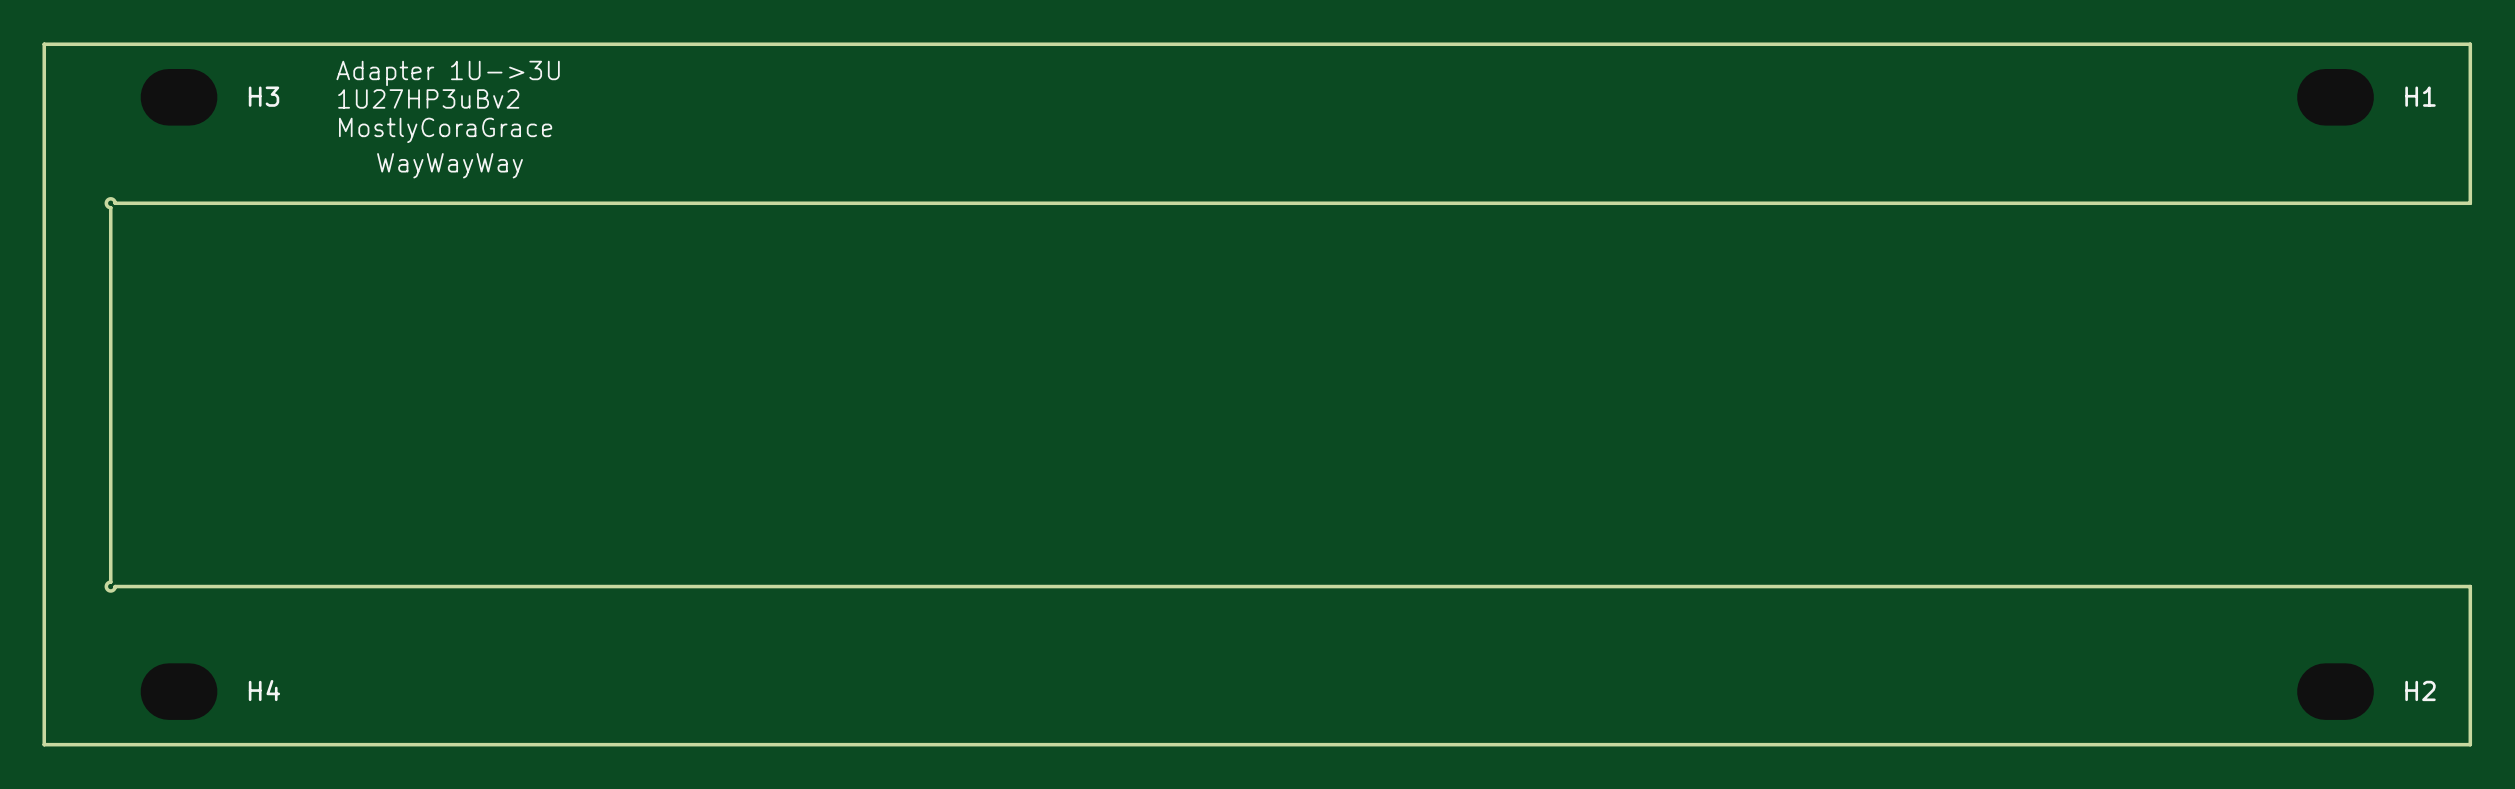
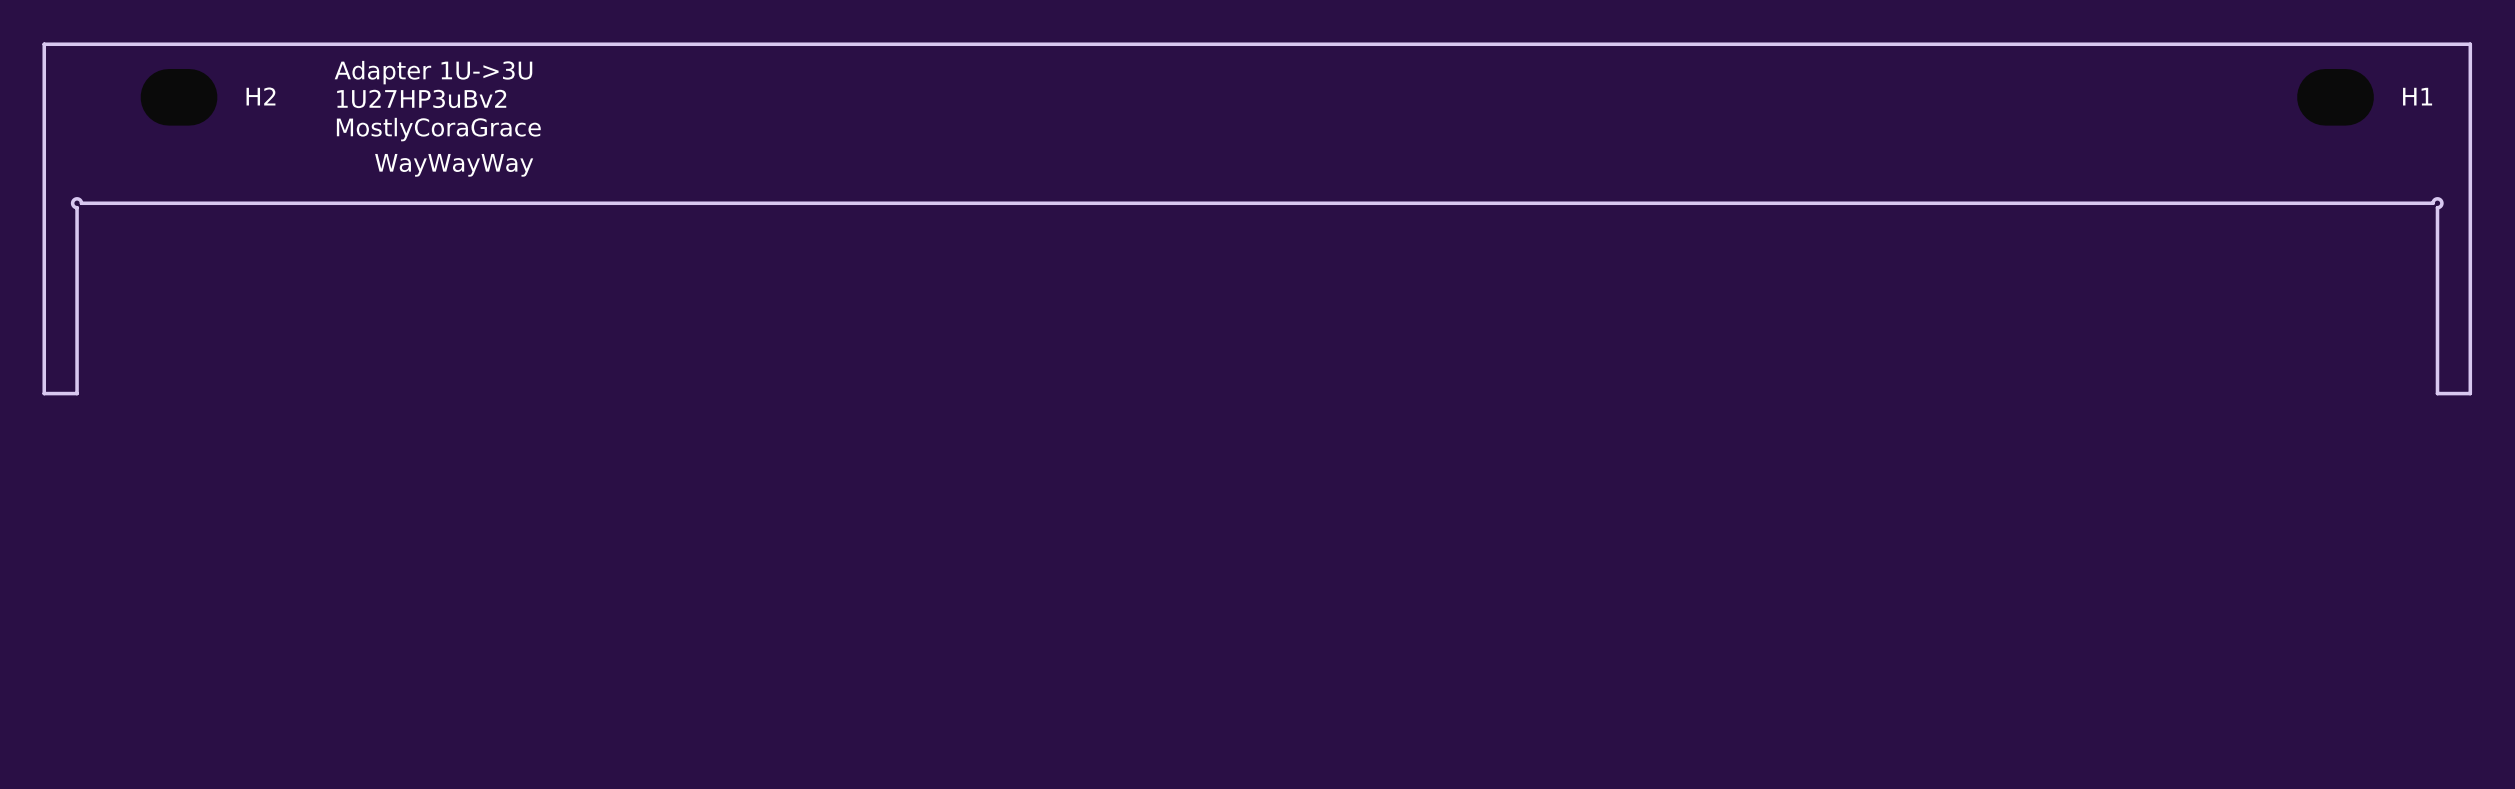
H3 name: H3 (264, 96) -> H2 (260, 96)
board edge: (115, 203) (111, 198) (106, 203) (110, 207) (110, 582) (106, 586) (110, 590) (113, 589) (115, 586) (2470, 586) (2470, 744) (44, 744) (44, 393) -> (115, 203) (81, 203) (77, 198) (73, 201) (73, 205) (77, 207) (77, 393) (44, 393)
board edge: (2470, 203) (2433, 203) -> (2470, 203) (2470, 393) (2437, 393) (2437, 207) (2441, 203) (2437, 198) (2433, 203)
H4: (179, 691) -> none
H2: (2335, 691) -> none

